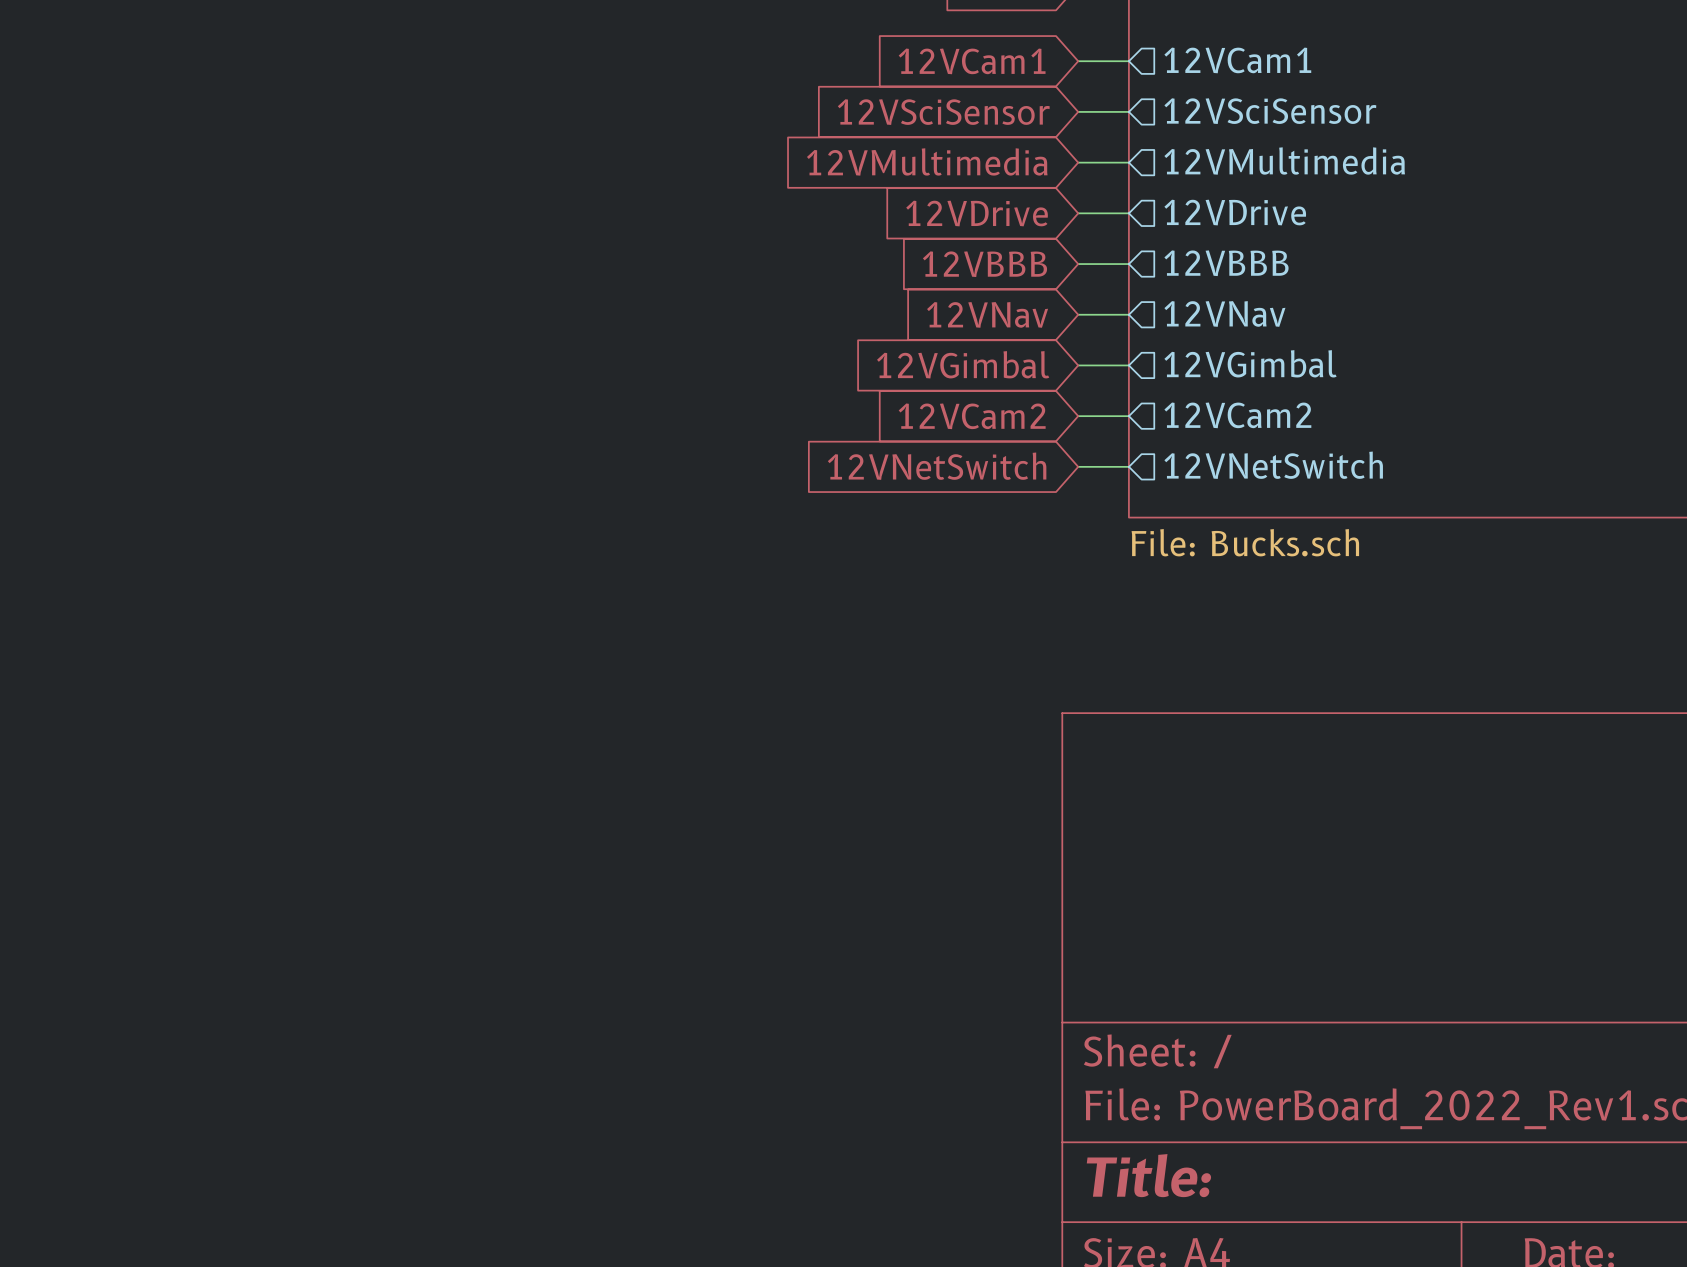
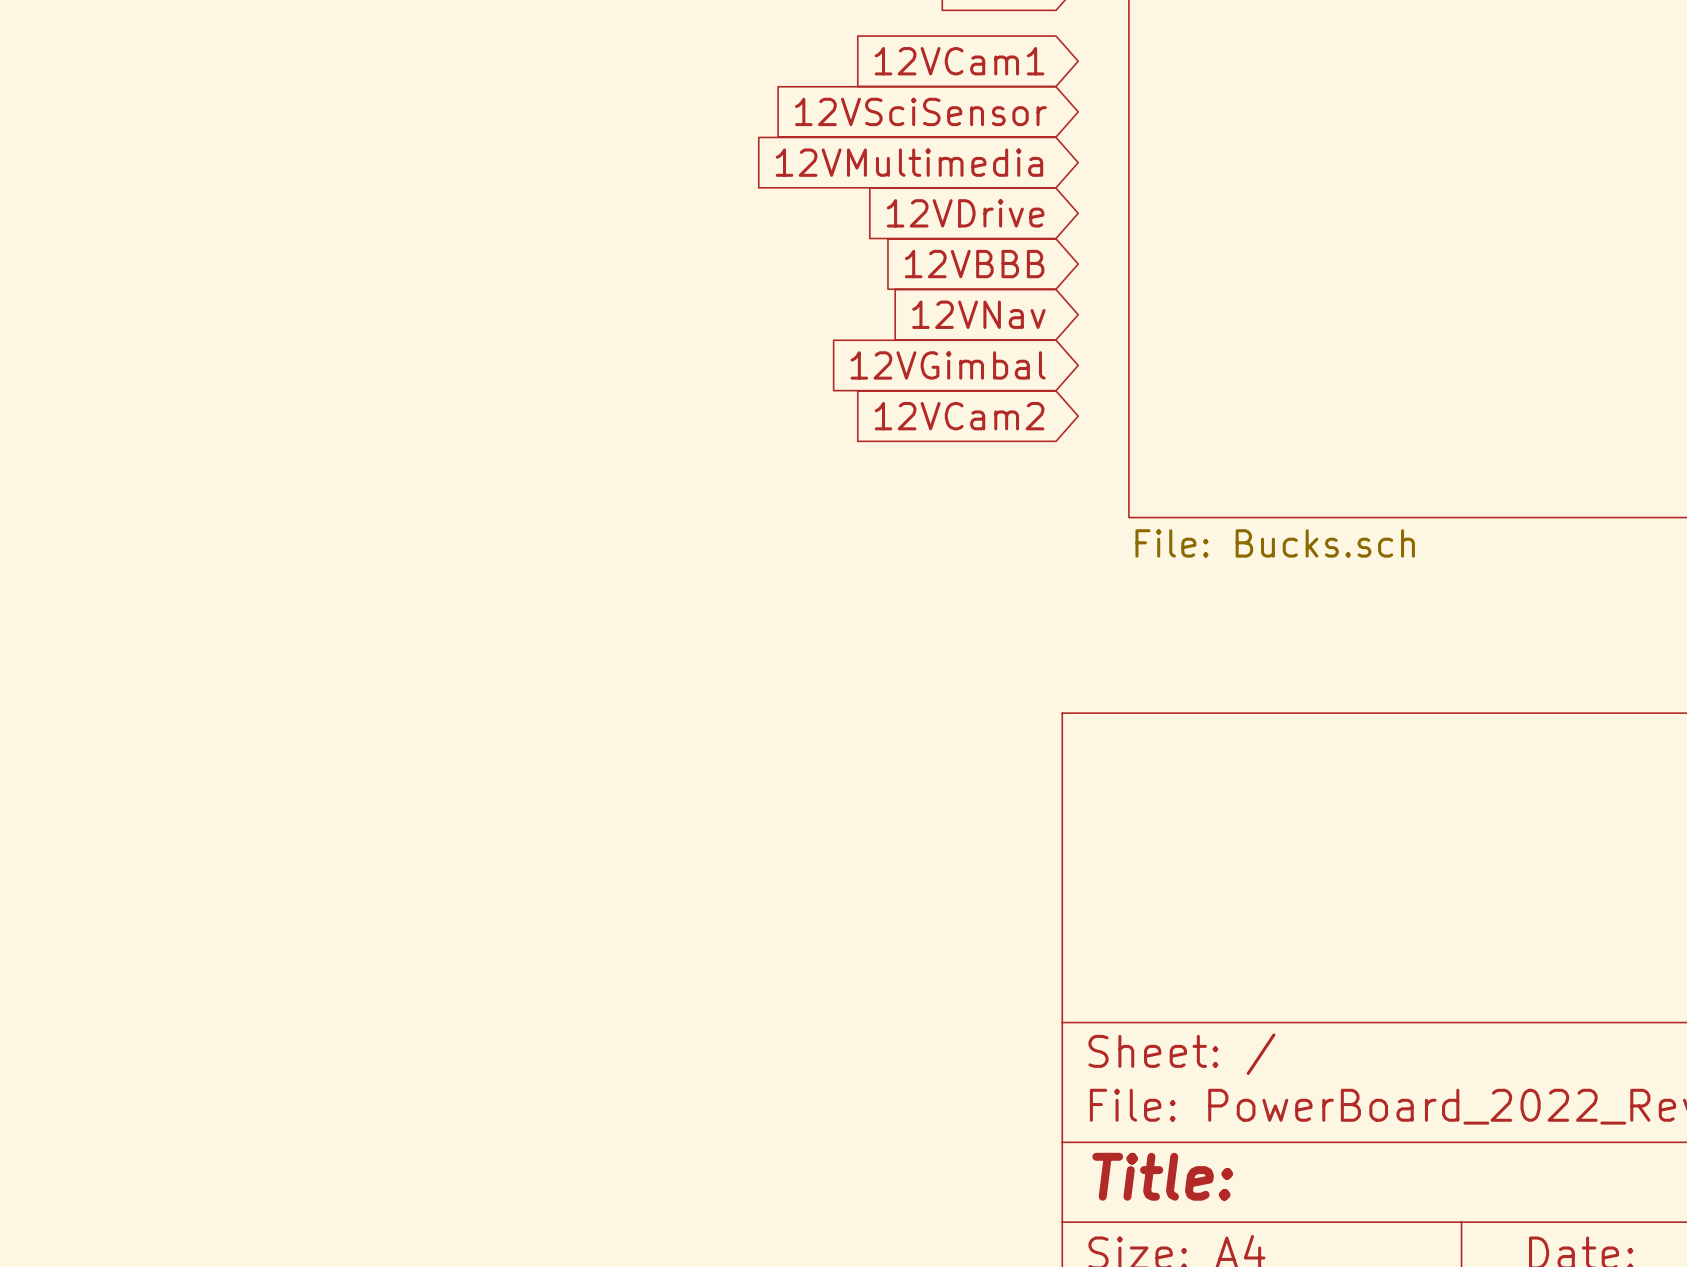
sheet pin: 12VCam1 (1237, 60) -> none
wire: (1078, 61) (1128, 61) -> none
wire: (1078, 111) (1128, 111) -> none
sheet pin: 12VSciSensor (1270, 111) -> none
sheet pin: 12VMultimedia (1284, 161) -> none
wire: (1078, 162) (1128, 162) -> none
sheet pin: 12VDrive (1235, 212) -> none
wire: (1078, 213) (1128, 213) -> none
sheet pin: 12VBBB (1226, 263) -> none
wire: (1078, 264) (1128, 264) -> none
sheet pin: 12VNav (1224, 313) -> none
wire: (1078, 314) (1128, 314) -> none
sheet pin: 12VGimbal (1250, 363) -> none
wire: (1078, 365) (1128, 365) -> none
sheet pin: 12VCam2 (1237, 415) -> none
wire: (1078, 416) (1128, 416) -> none
sheet pin: 12VNetSwitch (1273, 465) -> none
global label: 12VNetSwitch (937, 466) -> none
wire: (1078, 466) (1128, 466) -> none

